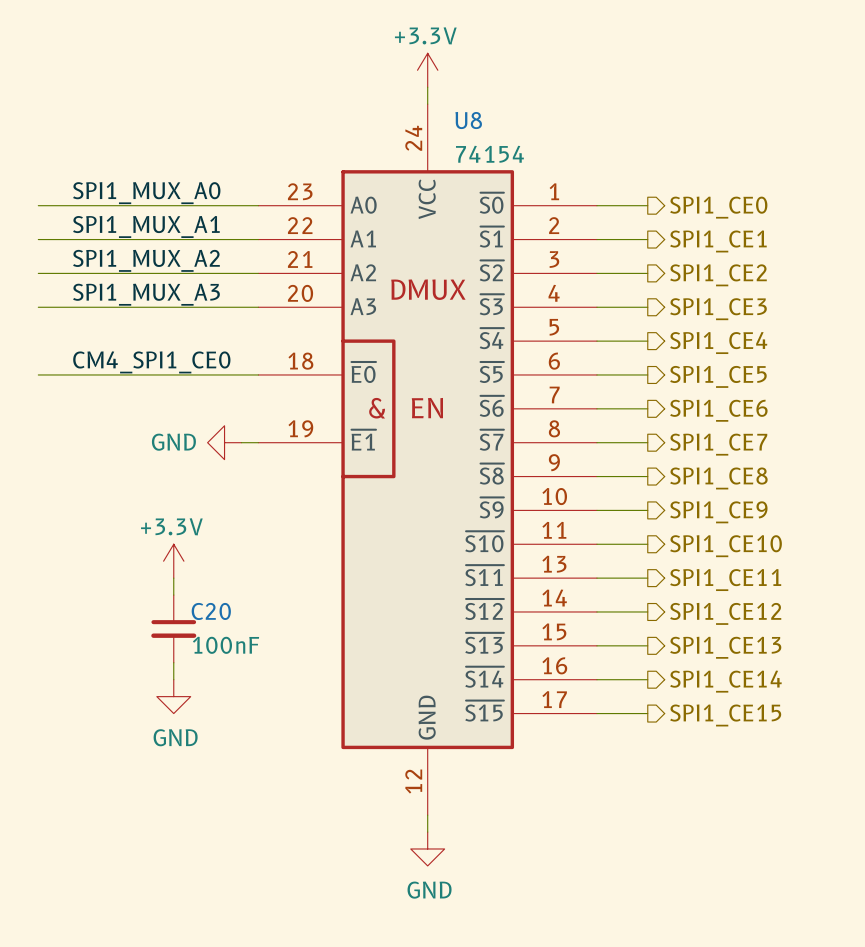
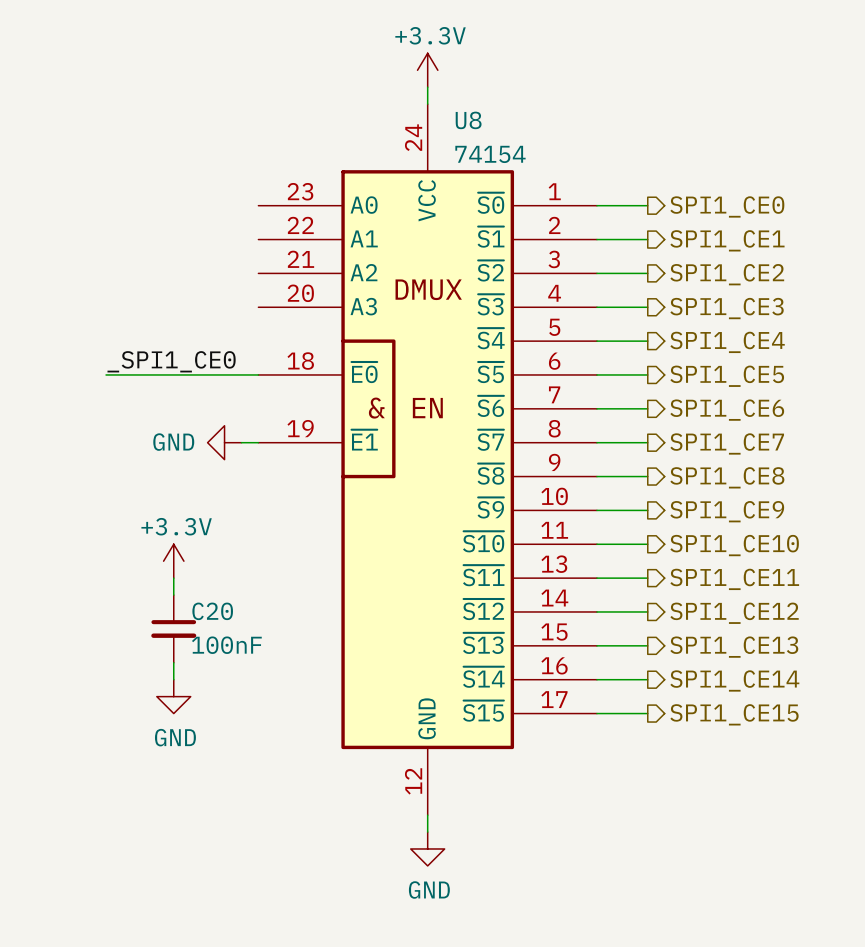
label: SPI1_MUX_A0 (146, 193) -> none
wire: (38, 205) (258, 205) -> none
label: SPI1_MUX_A1 (146, 226) -> none
wire: (38, 239) (258, 239) -> none
label: SPI1_MUX_A2 (146, 260) -> none
wire: (38, 273) (258, 273) -> none
label: SPI1_MUX_A3 (146, 294) -> none
wire: (38, 307) (258, 307) -> none
label: CM4_SPI1_CE0 (151, 362) -> _SPI1_CE0 (171, 361)
wire: (38, 374) (106, 374) -> none

